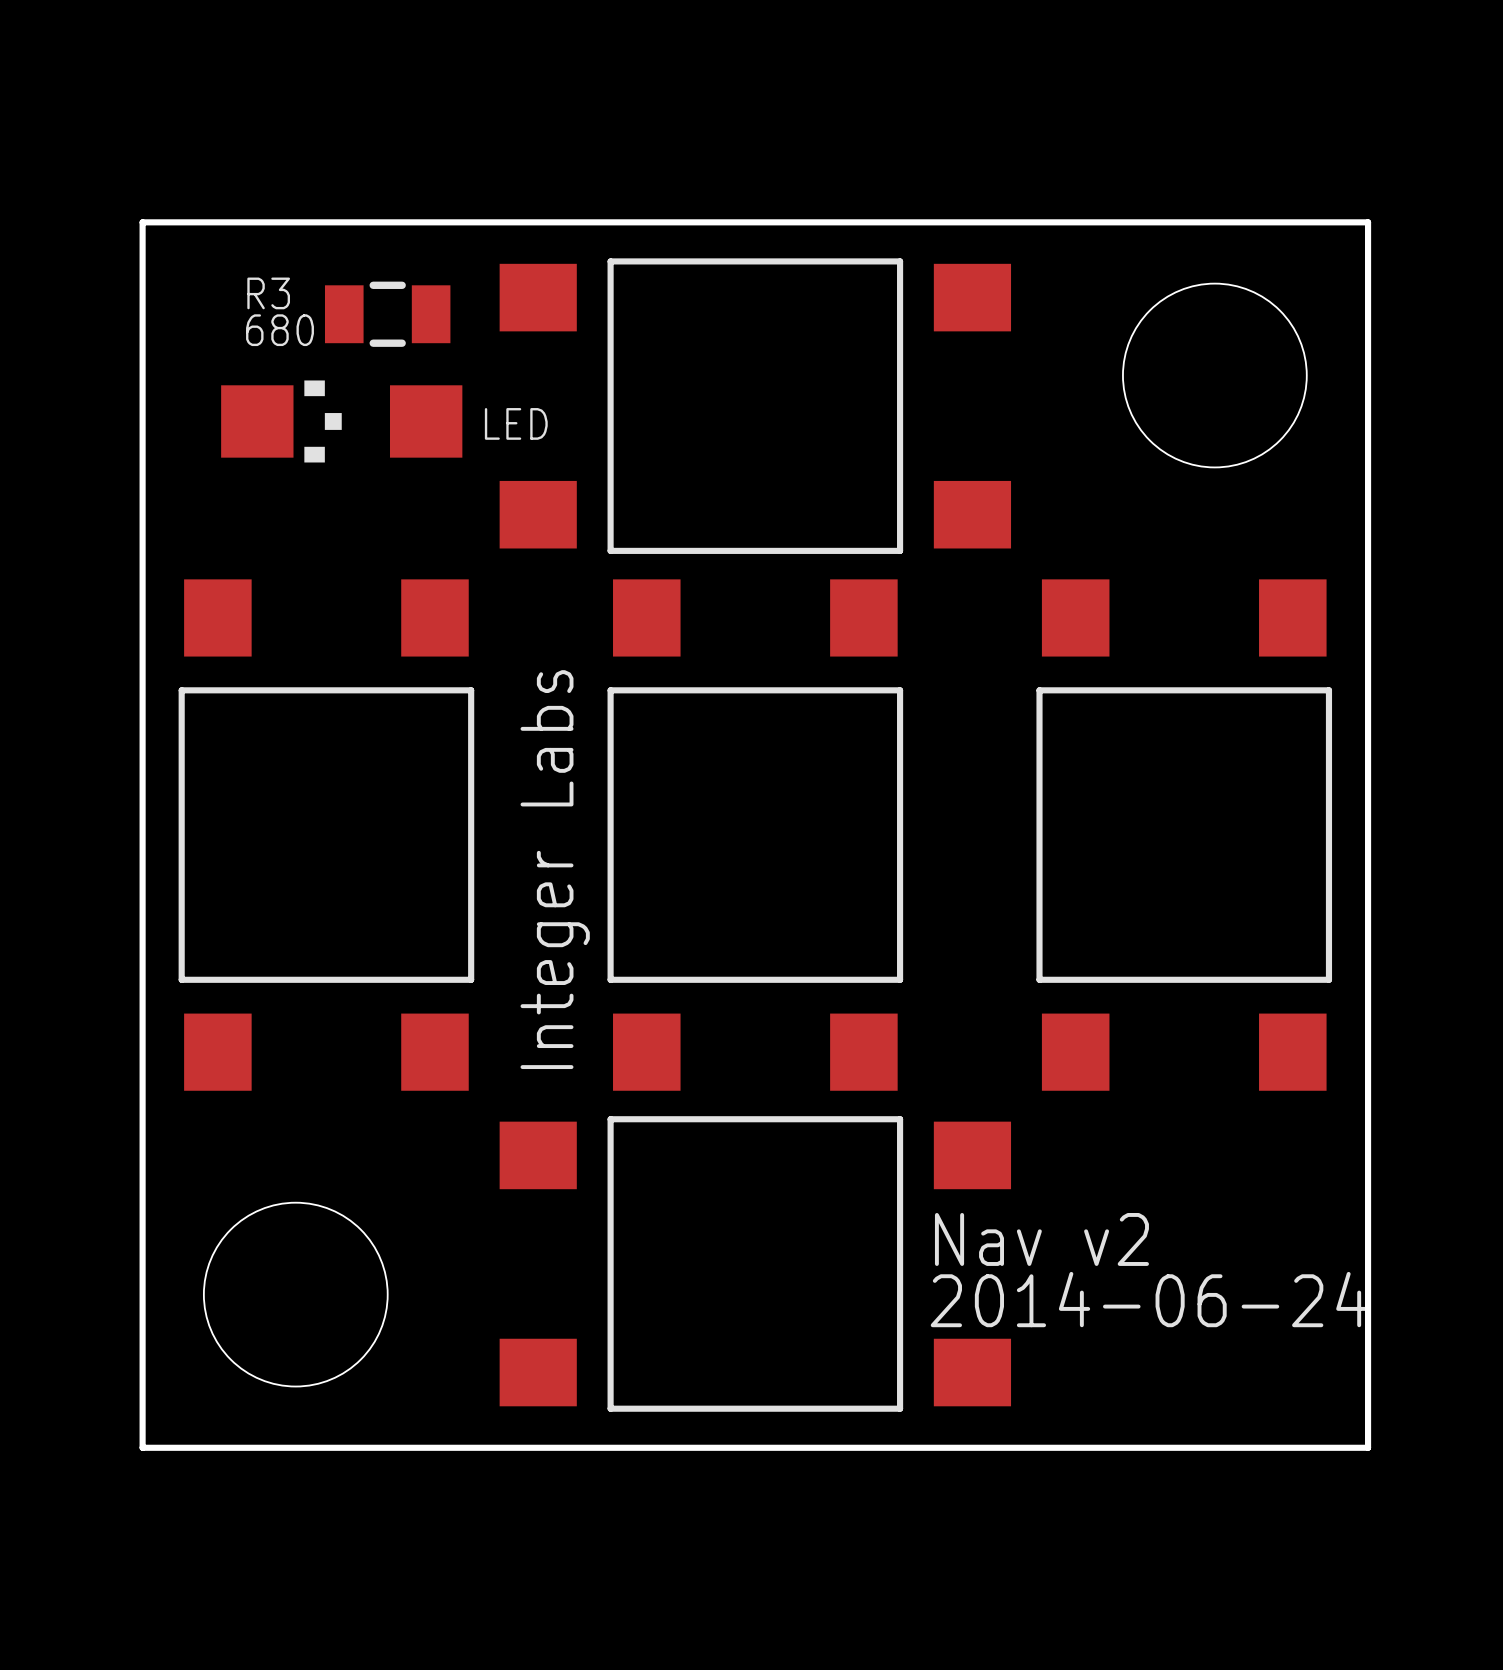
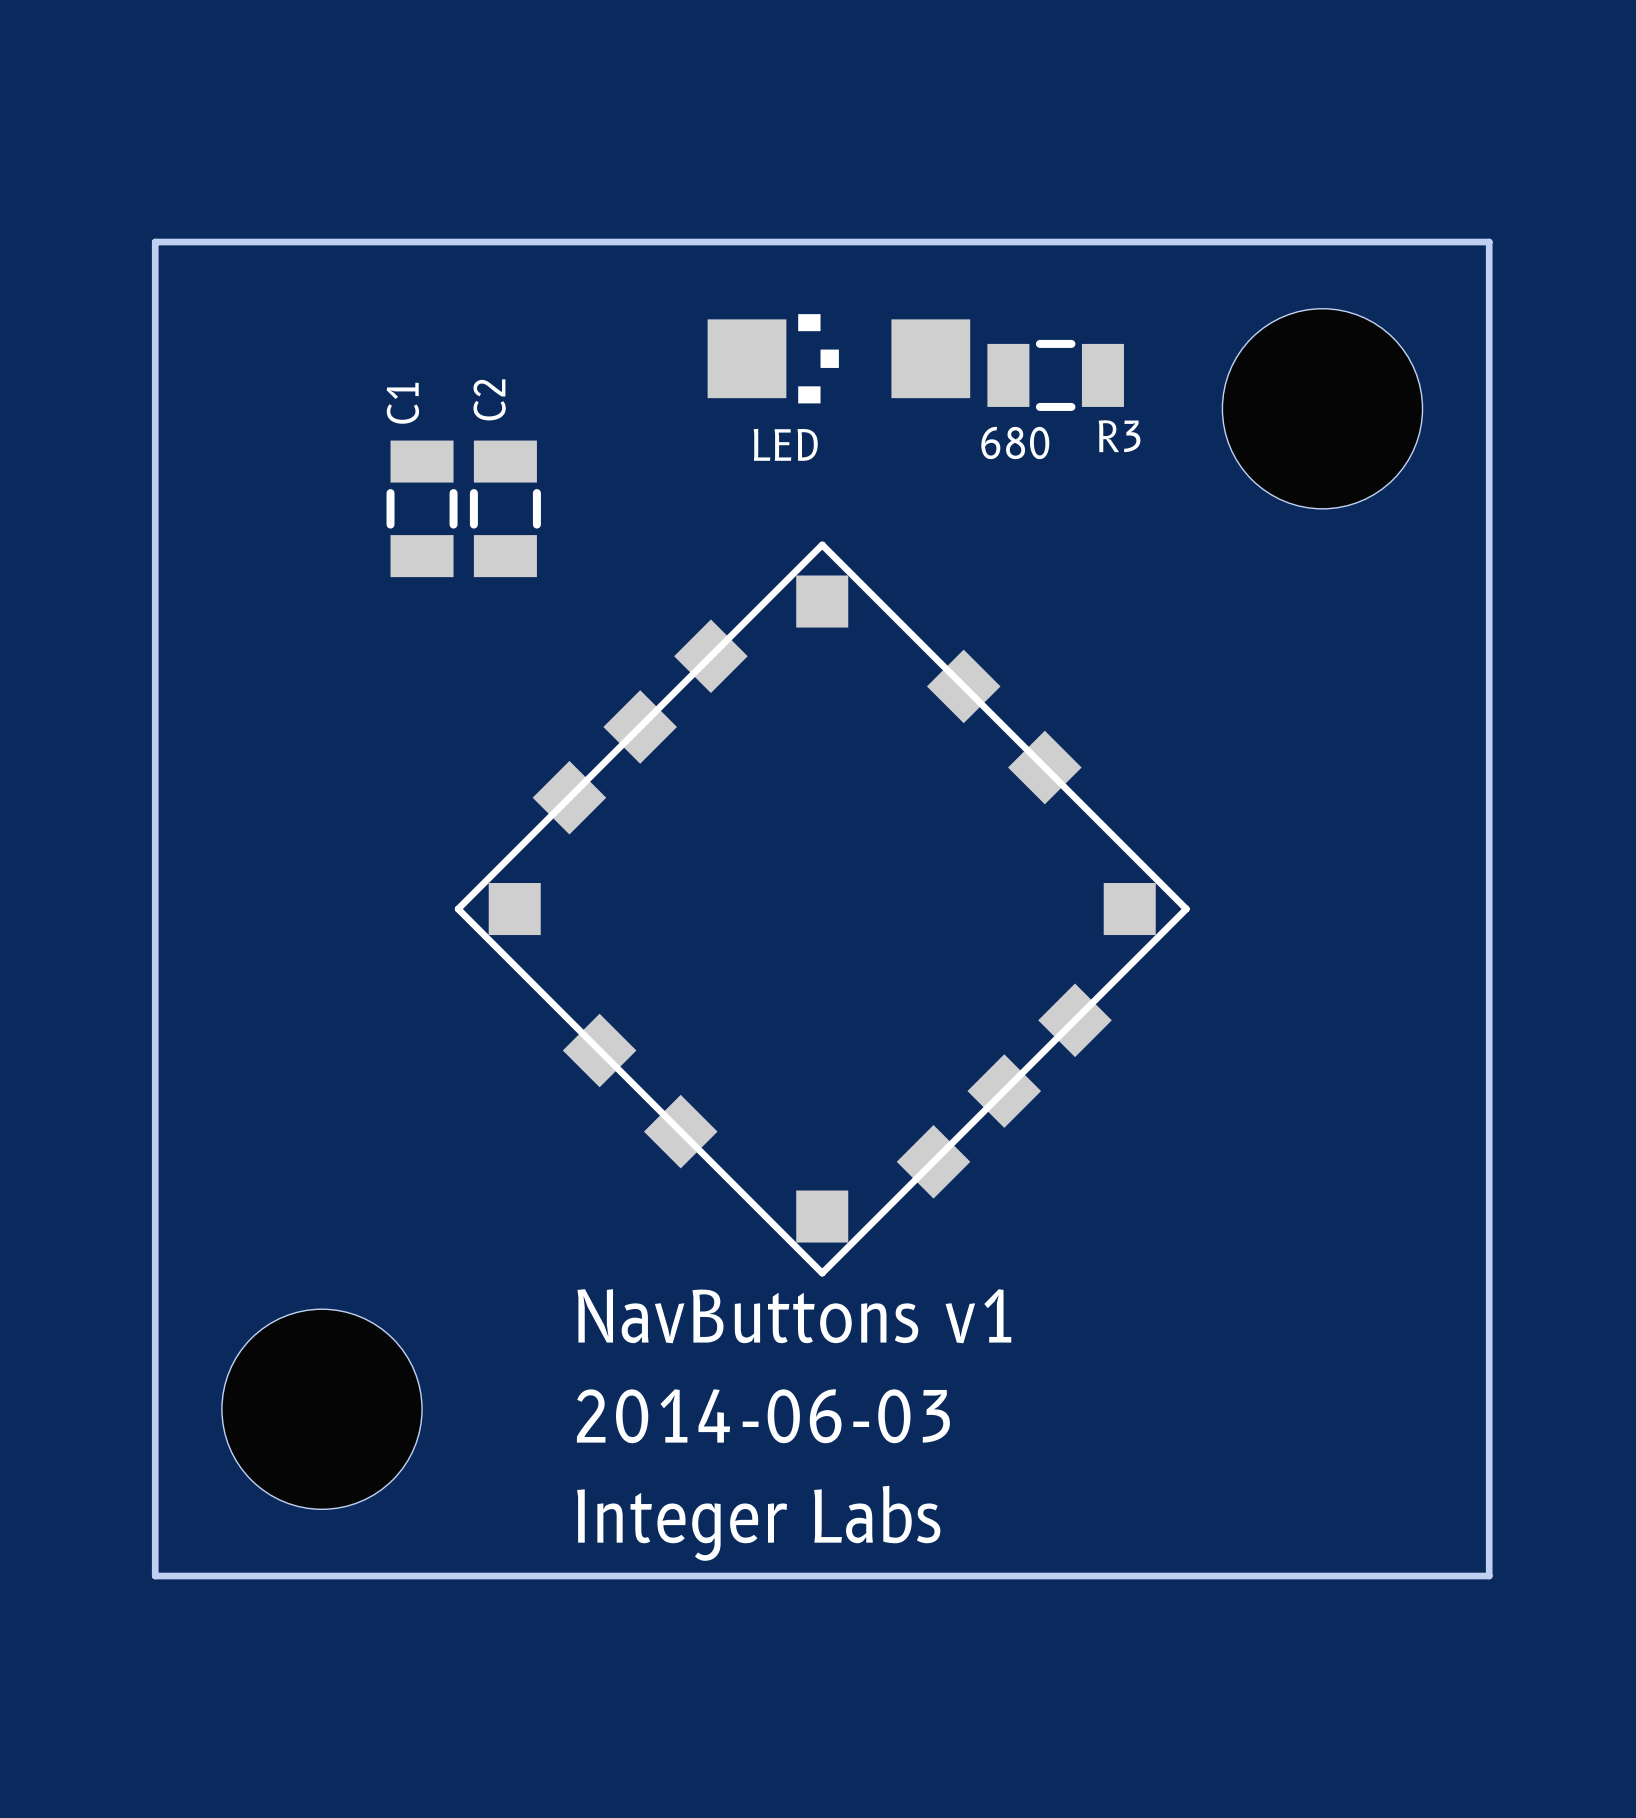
R3 name position: R3 (268, 293) -> R3 (1119, 436)
R3 position: (387, 314) -> (1055, 375)
R3 value position: 680 (280, 330) -> 680 (1015, 443)
part: (755, 406) -> none
LED position: (341, 421) -> (838, 358)
LED name position: LED (516, 423) -> LED (785, 444)
C1: none -> (422, 508)
C2: none -> (505, 508)
part footprint: [607, 579, 904, 1091] -> [454, 541, 1190, 1277]
part: (326, 835) -> none
part: (1184, 835) -> none
text rotation: 0° (555, 869) -> 90° clockwise (758, 1523)
text position: Integer Labs (555, 869) -> Integer Labs (758, 1523)
text: none -> NavButtons v1 (794, 1316)
text: Nav v2 (1041, 1239) -> none
part: (755, 1263) -> none
text: 2014-06-24 (1149, 1299) -> 2014-06-03 (763, 1416)

